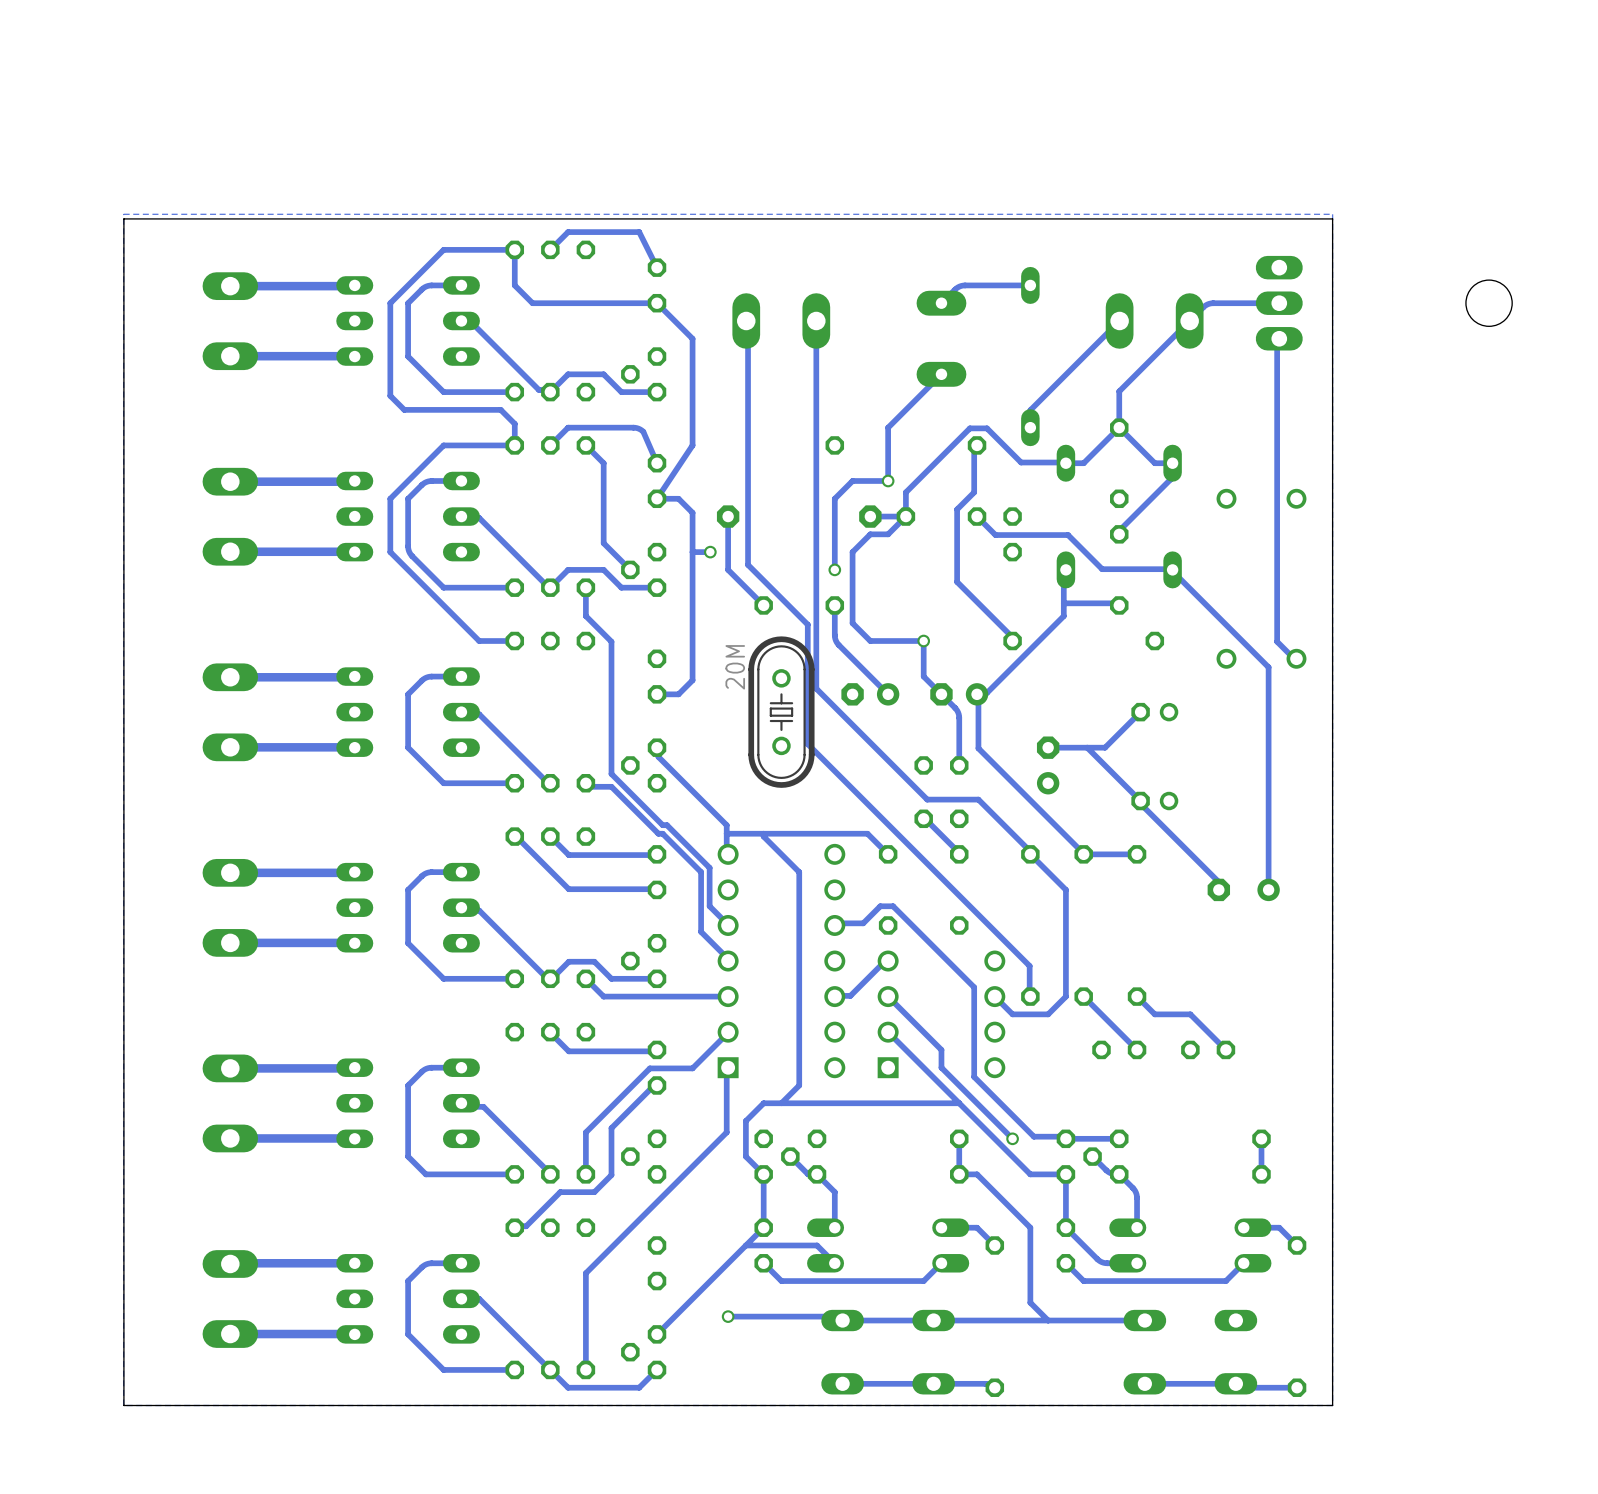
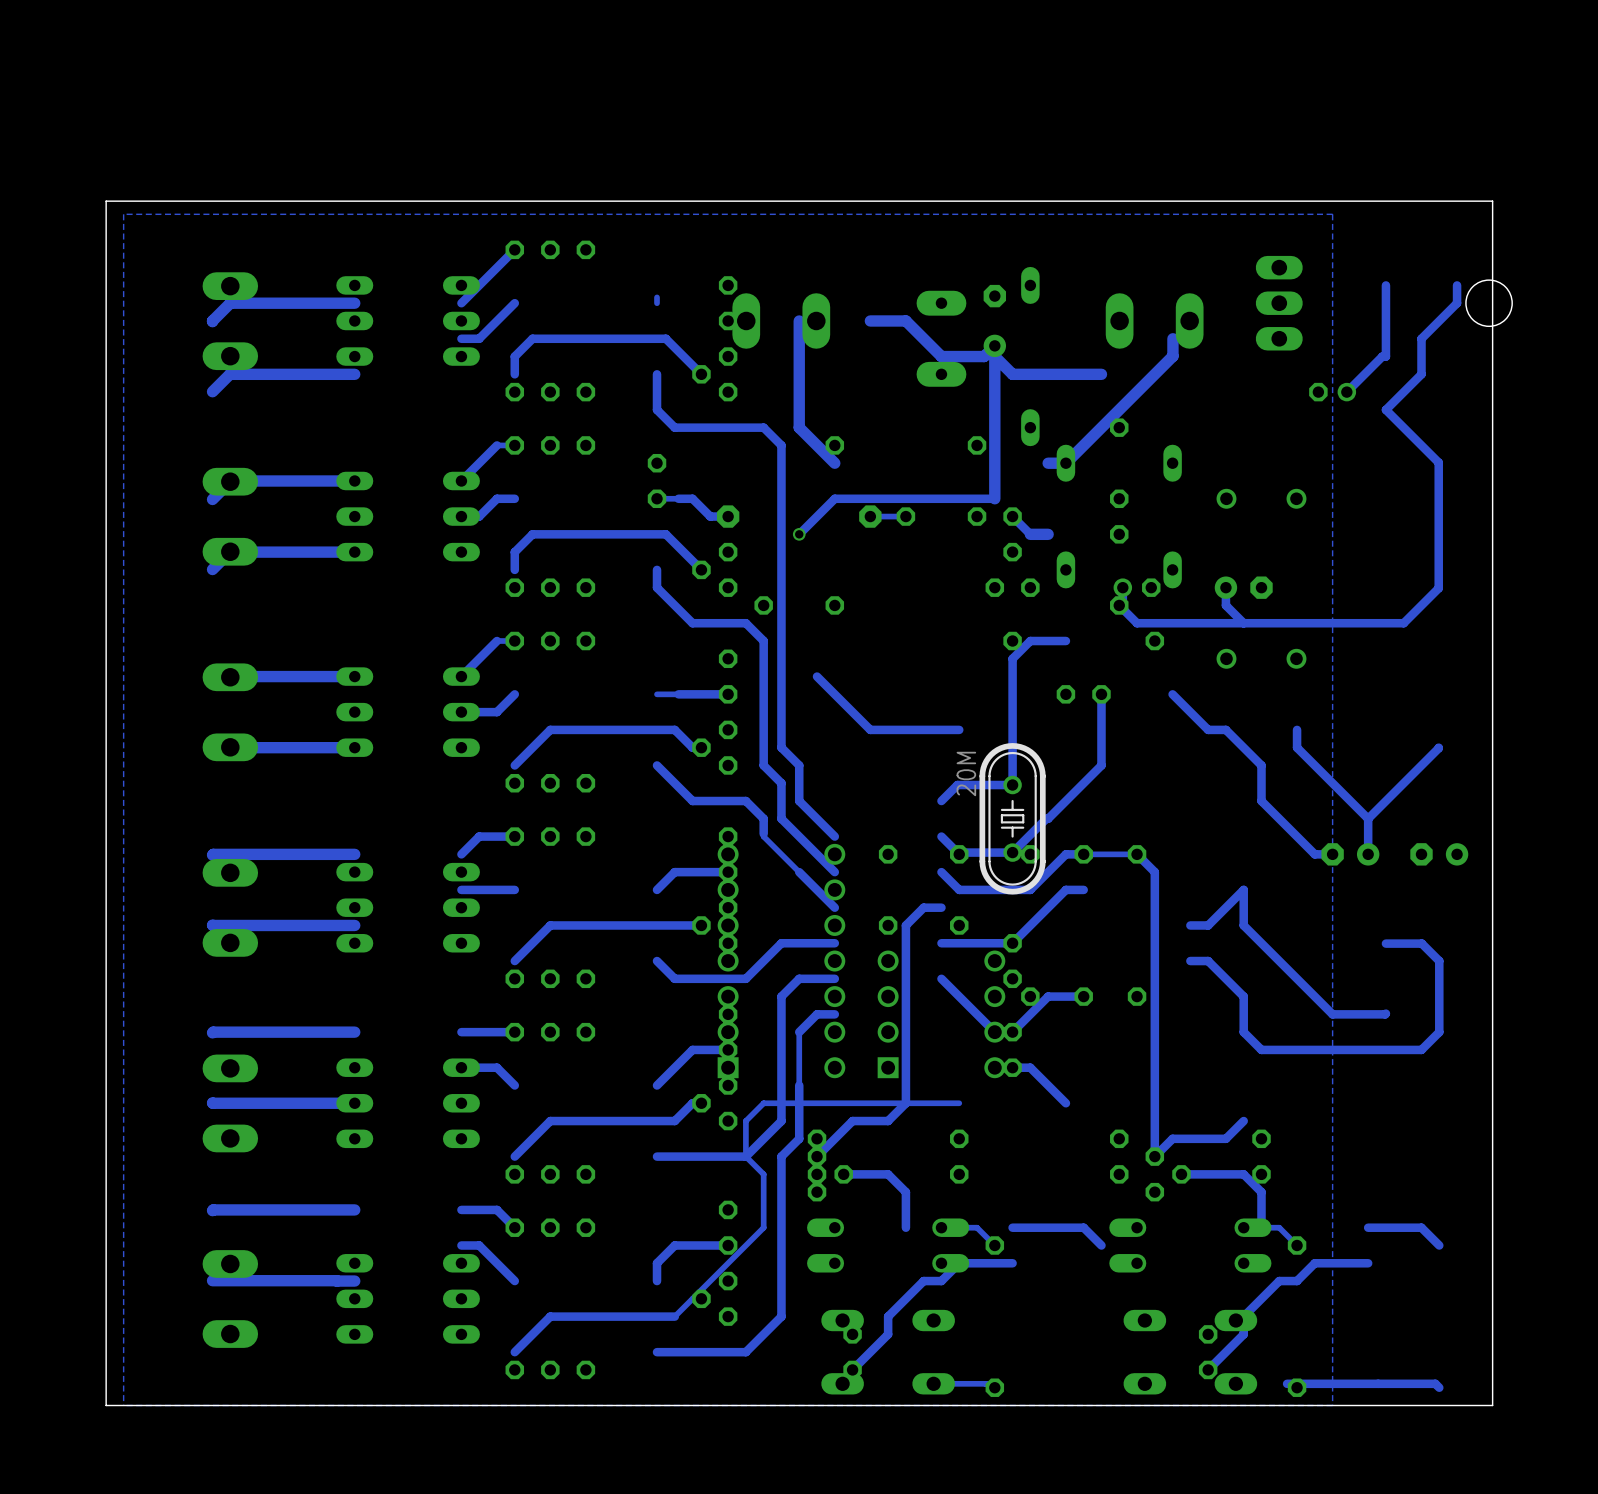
track: none -> (514, 249) (461, 303)
track: (550, 249) (568, 232) (639, 232) (657, 267) -> none
track: (354, 285) (230, 286) (232, 285) -> none
track: (461, 285) (428, 285) (408, 303) (408, 356) (443, 392) (514, 392) -> none
part position: (657, 285) -> (728, 303)
track: (1030, 285) (961, 285) (941, 303) -> none
track: none -> (1385, 285) (1385, 356) (1382, 356) (1346, 392)
track: none -> (1457, 285) (1457, 303) (1421, 338) (1421, 374) (1385, 409) (1438, 462) (1438, 588) (1403, 623) (1137, 623) (1122, 609) (1122, 587)
track: none -> (354, 303) (230, 303) (212, 321)
track: none -> (514, 303) (479, 338) (461, 338)
track: (1279, 303) (1213, 303) (1204, 306) (1119, 391) (1119, 427) -> none
track: (461, 320) (470, 321) (538, 389) (547, 389) (550, 392) (568, 374) (603, 374) (621, 392) (657, 392) -> none
track: (746, 320) (748, 321) (748, 564) (807, 624) (807, 744) (1029, 966) (1030, 996) -> none
track: none -> (799, 320) (799, 427) (834, 463)
track: (816, 320) (816, 688) (927, 799) (978, 799) (1065, 889) (1065, 996) (1048, 1014) (1012, 1014) (994, 996) -> none
track: none -> (870, 320) (905, 320) (941, 356) (984, 356) (994, 345)
part: none -> (994, 320)
track: (1119, 320) (1030, 410) (1030, 427) -> none
track: none -> (1172, 338) (1172, 356) (1065, 463) (1048, 463)
track: (1279, 338) (1277, 338) (1277, 641) (1294, 658) (1296, 658) -> none
track: none -> (989, 351) (1012, 374) (1101, 374)
track: (354, 356) (231, 356) -> none
track: none -> (994, 356) (994, 498) (834, 498) (799, 534)
track: none -> (354, 374) (229, 374) (212, 391)
part position: (643, 374) -> (714, 374)
track: none -> (657, 374) (657, 409) (674, 427) (763, 427) (781, 445) (781, 747) (799, 765) (799, 801) (834, 836)
track: none -> (701, 374) (665, 338) (532, 338) (514, 356) (514, 374)
track: (941, 374) (888, 427) (888, 481) (852, 481) (834, 498) (834, 569) -> none
part: none -> (1332, 392)
track: (1119, 427) (1083, 463) (1021, 462) (986, 428) (969, 428) (905, 492) (905, 516) (888, 534) (870, 534) (852, 552) (852, 623) (870, 641) (923, 641) (923, 676) (955, 708) (958, 714) (959, 765) -> none
track: (1119, 427) (1154, 463) (1172, 463) (1170, 466) (1170, 479) (1119, 530) (1119, 534) -> none
track: (497, 445) (443, 445) (390, 498) (390, 552) (479, 641) (497, 641) -> none
track: (514, 445) (514, 423) (500, 409) (404, 409) (390, 395) (390, 303) (443, 249) (514, 249) (514, 285) (532, 303) (651, 303) (657, 297) (659, 305) (692, 338) (692, 445) (657, 498) -> none
track: (550, 445) (568, 427) (635, 427) (643, 431) (657, 463) -> none
track: (585, 445) (603, 463) (603, 543) (630, 569) -> none
track: (977, 445) (974, 445) (974, 492) (957, 509) (957, 581) (1012, 637) (1012, 641) -> none
track: (354, 481) (230, 481) -> (354, 481) (231, 481) (212, 499)
track: (461, 481) (428, 481) (408, 498) (408, 546) (409, 553) (443, 587) (514, 587) -> (461, 481) (497, 445)
via: (888, 481) -> none
track: (678, 498) (692, 512) (692, 680) (678, 694) -> (728, 694) (678, 694)
track: (461, 516) (479, 517) (550, 587) (568, 569) (603, 569) (621, 587) (657, 587) -> (461, 516) (479, 516) (497, 498) (514, 498)
track: (728, 516) (728, 569) (763, 605) -> (728, 516) (710, 516) (692, 498) (678, 498)
track: (977, 516) (995, 535) (1068, 535) (1102, 569) (1172, 569) (1268, 667) (1268, 889) -> none
track: none -> (1012, 516) (1030, 534) (1048, 534)
via: none -> (799, 534)
track: (230, 551) (354, 552) -> (212, 569) (229, 552) (354, 552)
track: (710, 552) (692, 552) -> none
via: (710, 552) -> none
part position: (643, 569) -> (714, 569)
track: none -> (657, 569) (657, 587) (692, 623) (745, 623) (763, 641) (763, 765) (781, 783) (781, 818) (834, 872)
track: none -> (701, 569) (665, 534) (532, 534) (514, 552) (514, 569)
via: (834, 569) -> none
track: (1065, 569) (1063, 573) (1063, 616) (986, 692) (977, 694) (978, 748) (1083, 854) -> (941, 872) (959, 889) (1030, 889) (1065, 854) (1083, 854)
track: (585, 587) (585, 616) (611, 641) (611, 773) (662, 825) (666, 825) (709, 867) (709, 906) (728, 925) -> none
part: none -> (1012, 587)
part: none -> (1137, 587)
track: none -> (1225, 587) (1225, 605) (1243, 623)
part: none -> (1243, 587)
track: (1063, 603) (1119, 603) (1119, 605) -> none
track: (834, 605) (834, 635) (836, 642) (888, 694) -> none
via: (923, 641) -> none
track: none -> (1065, 641) (1030, 641) (1012, 658) (1012, 785) (957, 785) (941, 801)
track: (354, 676) (230, 677) (232, 676) -> (354, 676) (212, 677)
track: (461, 676) (428, 677) (408, 694) (408, 747) (443, 783) (514, 783) -> (461, 676) (497, 641)
part position: (657, 676) -> (728, 676)
track: none -> (817, 676) (870, 729) (959, 729)
part: (870, 694) -> none
part: (959, 694) -> none
part: none -> (1083, 694)
track: none -> (1101, 694) (1101, 765) (1012, 852) (957, 852) (941, 836)
track: none -> (1172, 694) (1208, 729) (1225, 729) (1261, 765) (1261, 801) (1314, 854) (1332, 854)
track: (461, 712) (462, 714) (479, 714) (550, 783) -> (461, 712) (497, 712) (514, 694)
part position: (781, 712) -> (1012, 818)
track: (1140, 712) (1105, 747) (1048, 747) (1050, 748) -> none
part: (1154, 712) -> none
track: none -> (1297, 729) (1297, 747) (1368, 818)
track: (354, 747) (231, 747) -> (354, 747) (212, 747)
track: (657, 747) (658, 756) (726, 825) (728, 854) -> none
track: none -> (701, 747) (692, 747) (674, 729) (550, 729) (514, 765)
track: (1087, 747) (1217, 880) (1218, 889) -> none
track: none -> (1438, 747) (1368, 818)
part position: (643, 765) -> (714, 747)
track: none -> (657, 765) (692, 801) (745, 801) (763, 818) (763, 833)
part: (941, 765) -> none
part: (1048, 765) -> none
track: (585, 783) (585, 786) (611, 786) (658, 833) (662, 833) (701, 872) (701, 931) (726, 957) -> none
part: (1154, 801) -> none
track: (923, 818) (959, 854) -> none
part: (941, 818) -> none
track: (726, 833) (867, 833) (888, 854) -> none
track: (514, 836) (568, 889) (657, 889) -> (514, 836) (479, 836) (461, 854)
track: (550, 836) (568, 855) (657, 854) -> none
track: none -> (354, 854) (212, 855)
track: none -> (1137, 854) (1154, 872) (1154, 1156) (1172, 1138) (1225, 1138) (1243, 1121)
part: none -> (1350, 854)
part: none -> (1439, 854)
track: (354, 872) (230, 872) (232, 872) -> none
track: (461, 872) (428, 872) (408, 889) (408, 943) (443, 978) (514, 978) -> none
part position: (657, 872) -> (728, 854)
track: none -> (728, 872) (674, 872) (657, 889)
track: (799, 872) (799, 1032) -> (799, 872) (834, 907)
track: none -> (514, 889) (461, 889)
track: none -> (1083, 889) (1065, 889) (1012, 943) (941, 943)
part: (1243, 889) -> none
track: (461, 907) (462, 910) (479, 910) (547, 978) (551, 978) (568, 961) (594, 961) (611, 978) (657, 978) -> none
track: none -> (941, 907) (923, 907) (905, 925) (905, 1103) (888, 1121) (852, 1121) (817, 1156)
track: none -> (212, 925) (354, 925)
track: none -> (701, 925) (550, 925) (514, 961)
part: none -> (714, 925)
track: (834, 925) (837, 923) (863, 923) (880, 906) (893, 906) (974, 987) (974, 1076) (1033, 1136) (1119, 1138) -> none
track: none -> (1190, 925) (1208, 925) (1243, 889) (1243, 925) (1332, 1014) (1385, 1013)
track: (354, 943) (231, 943) -> none
track: none -> (834, 943) (781, 943) (745, 978) (674, 978) (657, 961)
track: none -> (1385, 943) (1421, 943) (1439, 961) (1439, 1032) (1421, 1049) (1261, 1049) (1243, 1032) (1243, 996) (1208, 961) (1190, 961)
part: (643, 961) -> none
track: (888, 961) (884, 961) (850, 995) (834, 996) -> none
part: none -> (1012, 961)
track: (585, 978) (603, 996) (728, 996) -> none
track: none -> (834, 978) (799, 978) (781, 996) (781, 1121) (745, 1156) (657, 1156)
track: (888, 996) (941, 1049) (941, 1067) (1012, 1138) -> none
track: (1083, 996) (1137, 1049) -> (1083, 996) (1048, 996) (1012, 1032) (994, 1032) (941, 978)
track: (1137, 996) (1154, 1014) (1190, 1014) (1225, 1049) -> none
track: none -> (834, 1014) (817, 1014) (799, 1032)
track: none -> (354, 1032) (212, 1032)
track: none -> (514, 1032) (461, 1032)
track: (550, 1032) (568, 1051) (657, 1049) -> none
track: (728, 1032) (692, 1068) (649, 1068) (585, 1132) (585, 1174) -> none
track: (888, 1032) (1030, 1174) (1065, 1174) (1065, 1227) (1097, 1259) (1105, 1263) (1137, 1263) -> none
track: none -> (728, 1049) (692, 1049) (657, 1085)
part: none -> (1012, 1049)
part: (1119, 1049) -> none
part: (1208, 1049) -> none
track: (354, 1067) (230, 1068) (232, 1067) -> none
track: (461, 1067) (428, 1068) (408, 1085) (408, 1156) (425, 1174) (514, 1174) -> (461, 1067) (497, 1067) (514, 1085)
part position: (657, 1067) -> (728, 1032)
track: (728, 1067) (726, 1132) (585, 1273) (585, 1369) -> none
track: none -> (1012, 1067) (1030, 1067) (1065, 1103)
track: (657, 1085) (654, 1085) (611, 1128) (611, 1175) (594, 1192) (560, 1192) (526, 1226) (514, 1227) -> (461, 1209) (497, 1209) (514, 1227)
track: (799, 1085) (781, 1103) -> (799, 1085) (799, 1138) (781, 1156) (781, 1316) (745, 1352) (657, 1352)
track: none -> (212, 1102) (354, 1103)
track: (461, 1103) (462, 1106) (483, 1106) (550, 1174) -> none
track: none -> (701, 1103) (692, 1103) (674, 1121) (550, 1121) (514, 1156)
part: none -> (714, 1103)
track: (354, 1138) (231, 1138) -> none
track: (959, 1138) (959, 1174) (977, 1174) (1030, 1227) (1030, 1302) (1048, 1320) -> none
via: (1012, 1138) -> none
track: (1261, 1138) (1261, 1174) -> (1368, 818) (1368, 854)
part: (643, 1156) -> none
part: (777, 1156) -> none
track: (790, 1156) (808, 1174) (817, 1174) (834, 1192) (834, 1227) -> none
part position: (1079, 1156) -> (1168, 1174)
track: (1092, 1156) (1109, 1172) (1119, 1174) (1135, 1190) (1137, 1197) (1137, 1227) -> none
part: none -> (830, 1174)
track: none -> (843, 1174) (888, 1174) (905, 1192) (905, 1227)
track: none -> (1181, 1174) (1243, 1174) (1261, 1192) (1261, 1227)
track: none -> (354, 1209) (212, 1210)
part: none -> (728, 1227)
track: none -> (1368, 1227) (1421, 1227) (1439, 1245)
track: none -> (461, 1245) (479, 1245) (514, 1281)
track: none -> (728, 1245) (674, 1245) (657, 1263) (657, 1281)
track: (745, 1245) (817, 1245) (834, 1263) -> (1012, 1227) (1083, 1227) (1101, 1245)
part: (763, 1245) -> none
part: (1065, 1245) -> none
track: (354, 1263) (230, 1263) (232, 1263) -> none
track: (461, 1263) (428, 1263) (408, 1281) (408, 1334) (443, 1369) (514, 1369) -> none
part: (657, 1263) -> none
track: (941, 1263) (923, 1281) (781, 1281) (763, 1263) -> none
track: none -> (1012, 1263) (959, 1263) (941, 1281) (923, 1281) (888, 1316) (888, 1334) (852, 1369)
track: (1243, 1263) (1225, 1281) (1083, 1281) (1065, 1263) -> none
track: none -> (1368, 1263) (1314, 1263) (1297, 1281) (1279, 1281) (1243, 1316) (1243, 1334) (1208, 1369)
track: none -> (212, 1280) (354, 1281)
track: (461, 1298) (479, 1298) (568, 1387) (639, 1387) (657, 1369) -> none
part: none -> (714, 1298)
track: (674, 1316) (657, 1334) -> (674, 1316) (550, 1316) (514, 1352)
track: (728, 1316) (838, 1316) (842, 1320) (1144, 1320) -> none
via: (728, 1316) -> none
track: (354, 1334) (231, 1334) -> none
part: (643, 1352) -> none
part: none -> (852, 1352)
part: none -> (1208, 1352)
track: (931, 1383) (842, 1383) -> none
track: (1144, 1383) (1235, 1383) (1245, 1387) (1297, 1387) -> none
track: none -> (1287, 1383) (1435, 1383) (1439, 1387)
board edge: (1332, 1405) (1332, 218) (123, 218) (123, 1405) -> (1332, 1405) (1492, 1405) (1492, 201) (106, 201) (106, 1405) (123, 1405)

